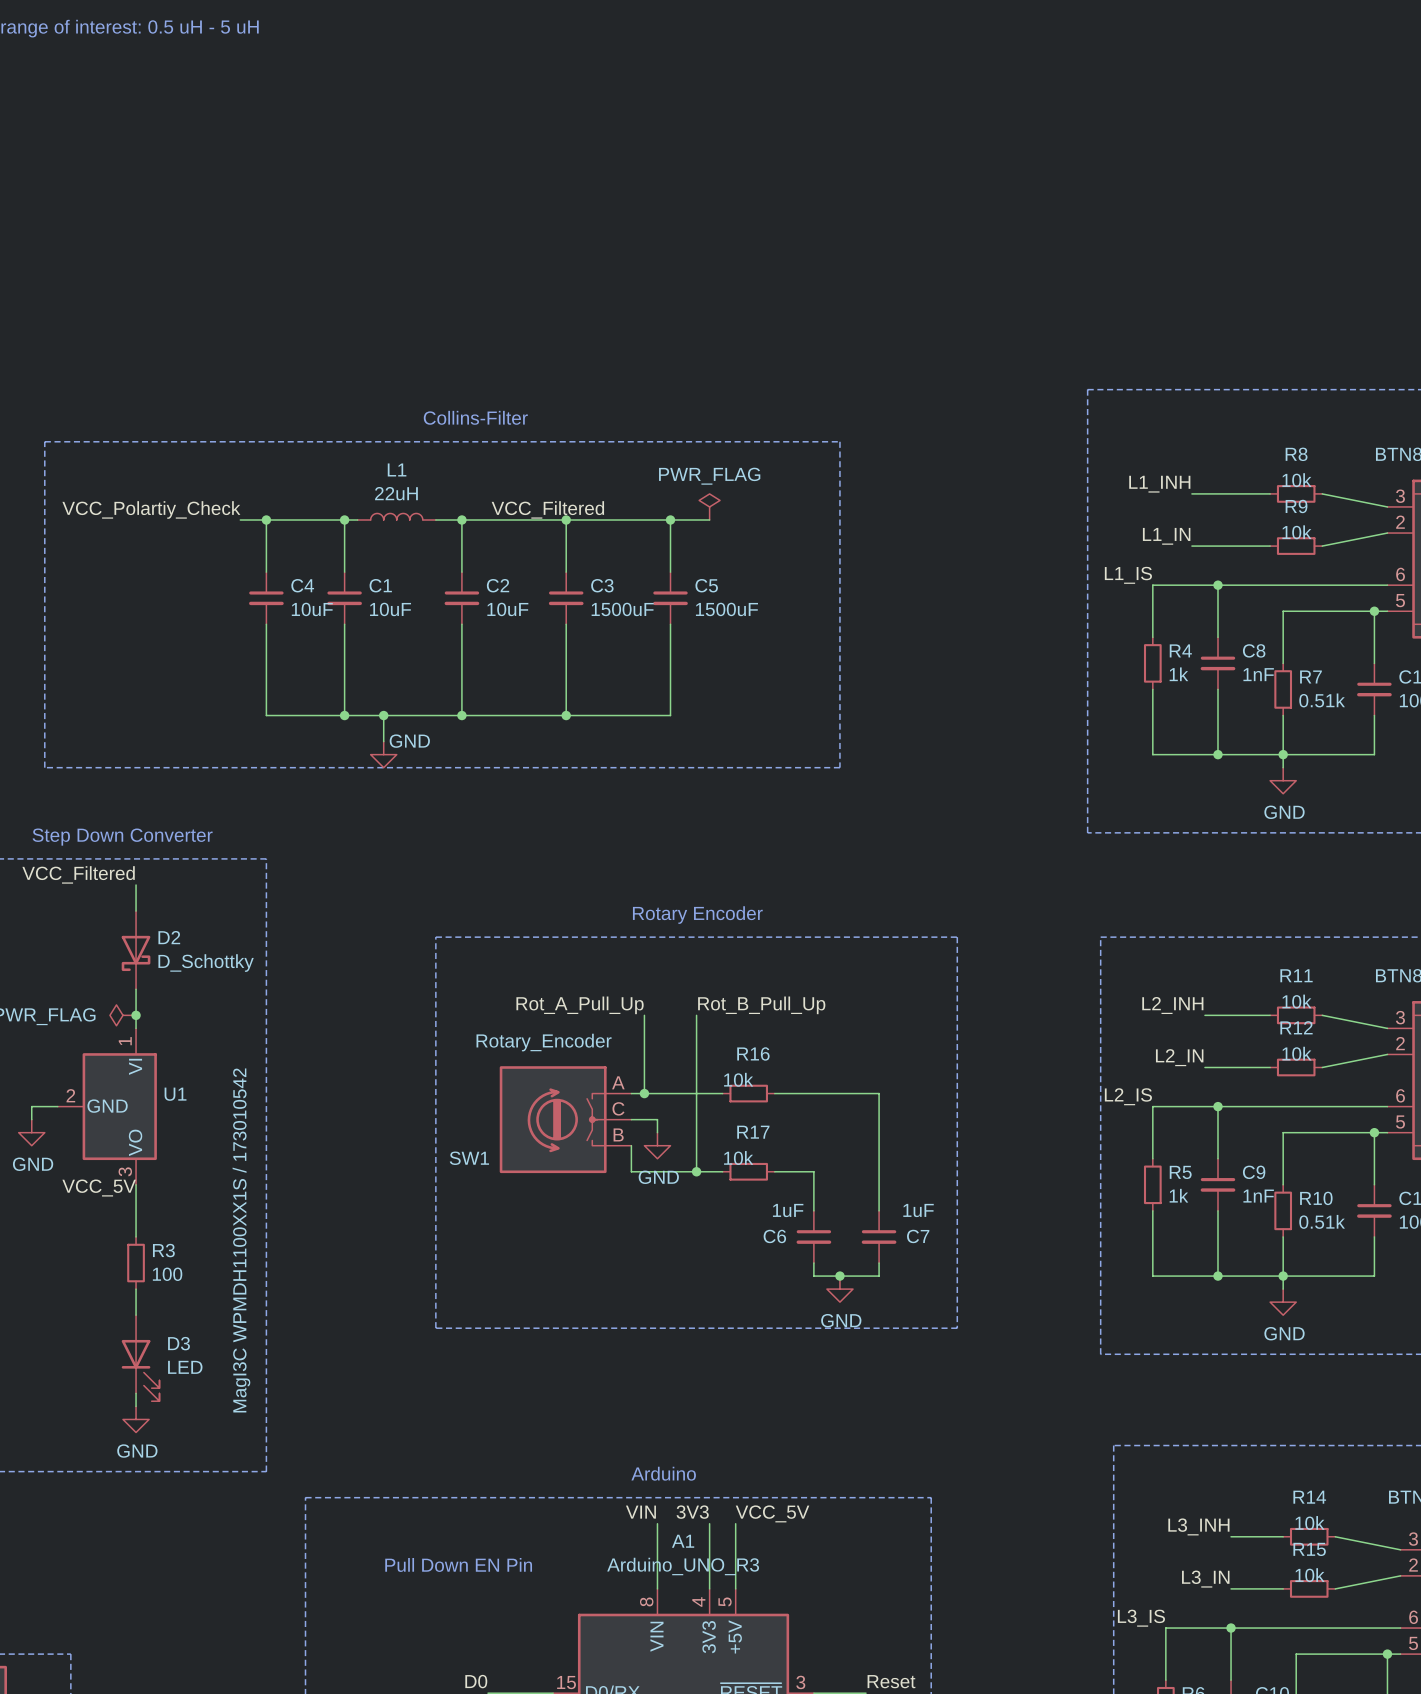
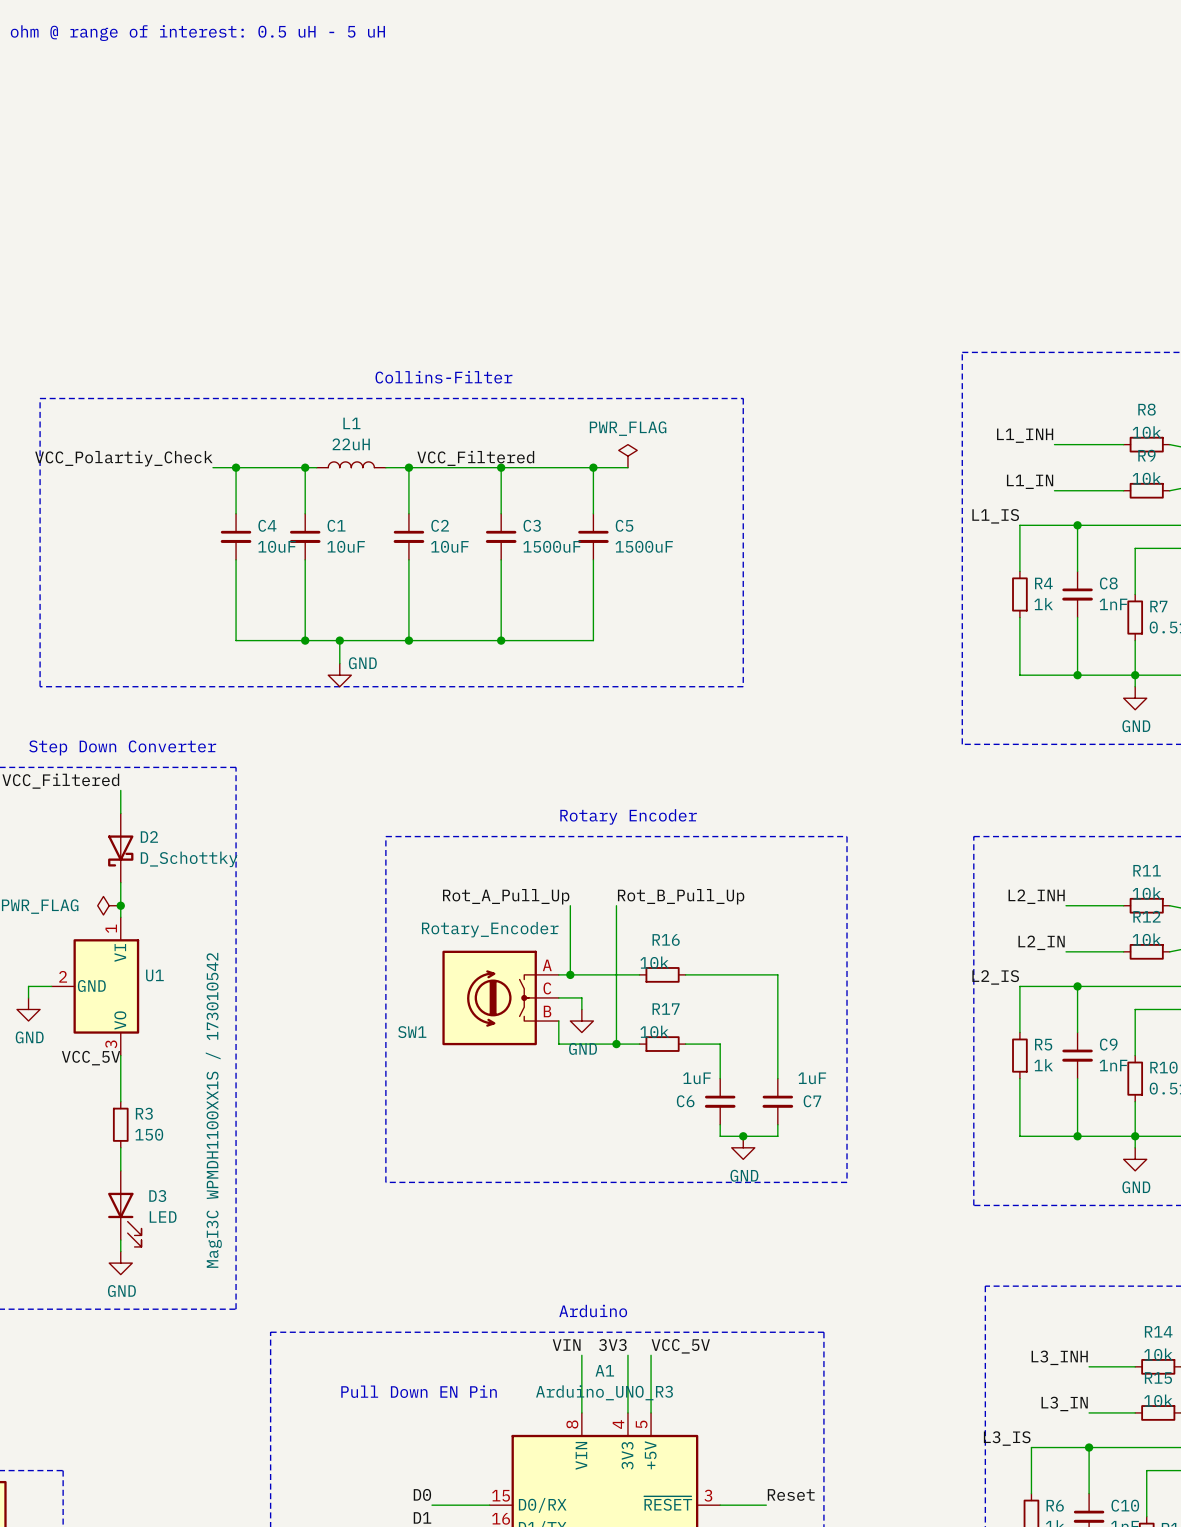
R3 value: 100 (167, 1274) -> 150 (149, 1134)

